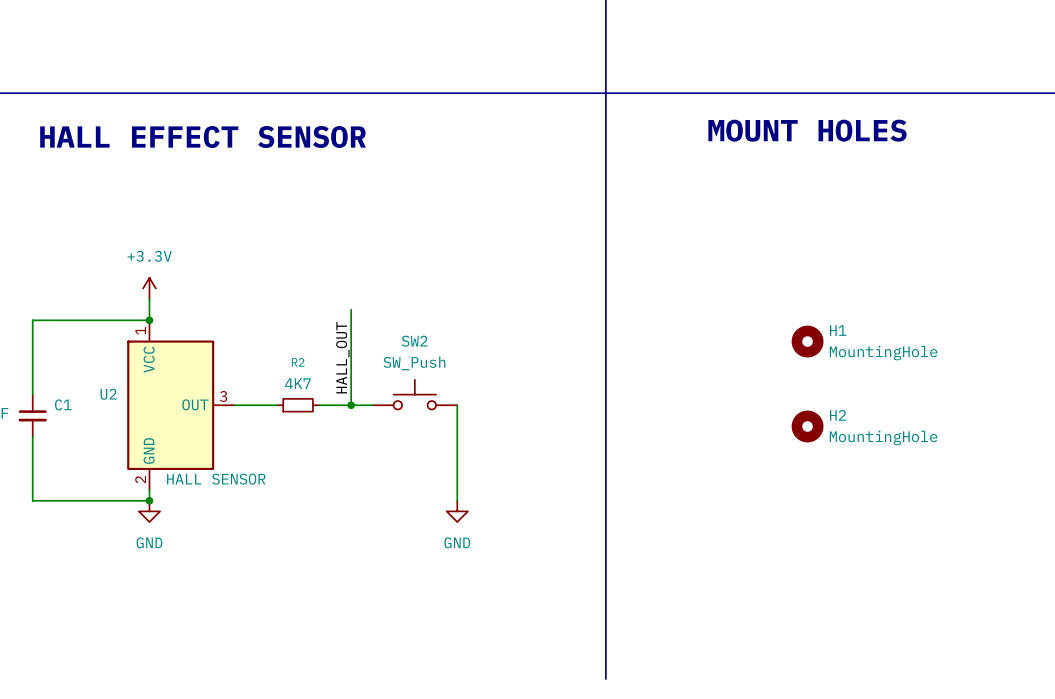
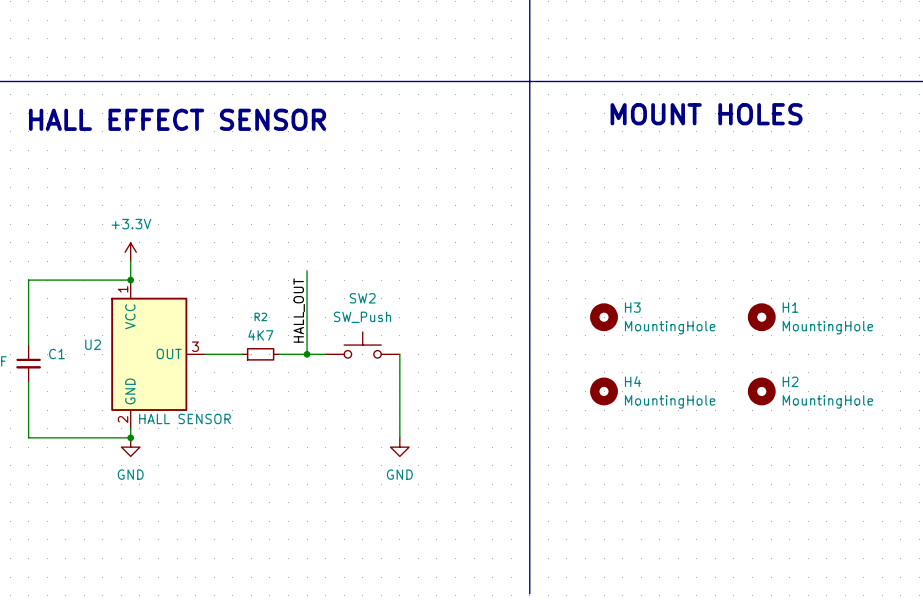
H1 position: (807, 341) -> (761, 317)
H3: none -> MountingHole (604, 317)
H2 position: (807, 426) -> (761, 391)
H4: none -> MountingHole (604, 391)

